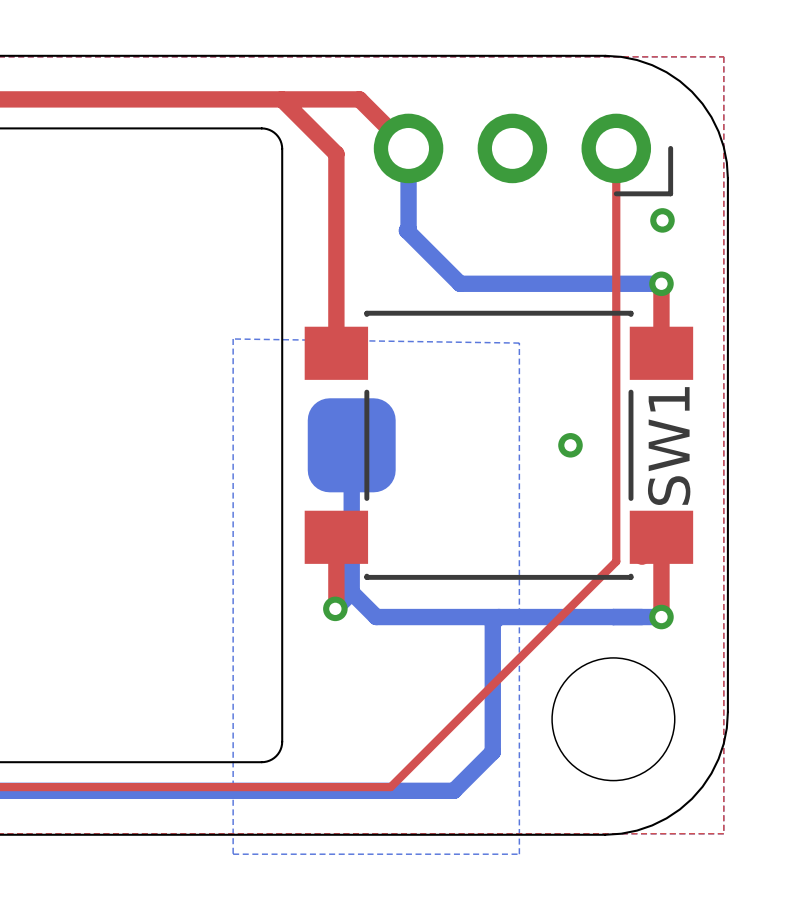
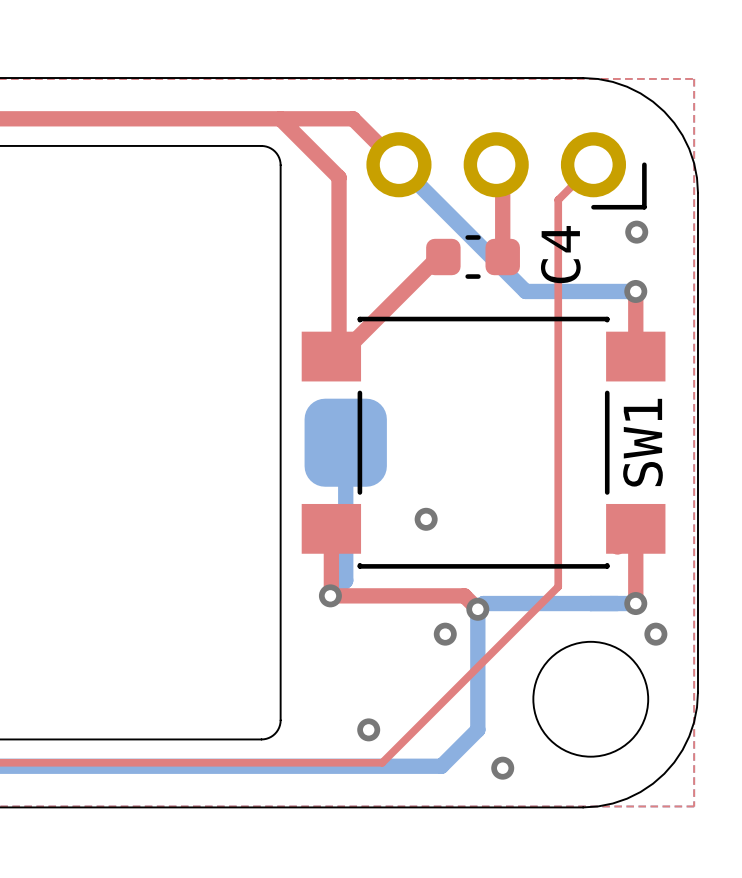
bottom track: (408, 148) (408, 228) (406, 230) (460, 283) (543, 283) -> (398, 164) (525, 291)
top track: (616, 148) (616, 561) (578, 599) -> (593, 164) (558, 199) (558, 586)
top track: (336, 153) (336, 353) -> (331, 169) (339, 177) (339, 356) (438, 257) (443, 257)
top track: none -> (502, 171) (502, 257)
C4: none -> (473, 257)
bottom zone outline: (233, 338) (233, 854) (519, 854) (519, 343) (233, 338) -> none
via: (570, 445) -> none
via: none -> (426, 519)
bottom track: (351, 592) (376, 617) (498, 617) -> none
top track: none -> (330, 595) (464, 595) (477, 609)
via: none -> (477, 609)
via: none -> (445, 634)
via: none -> (655, 634)
via: none -> (368, 729)
via: none -> (502, 768)

